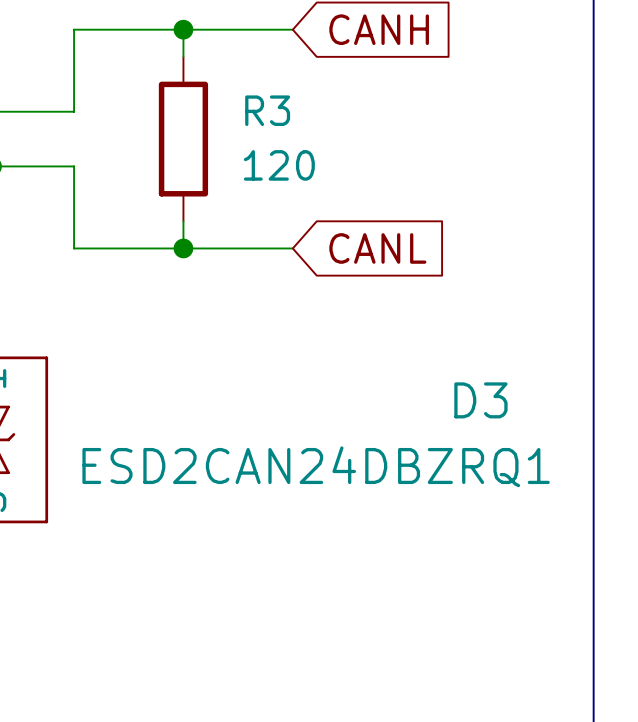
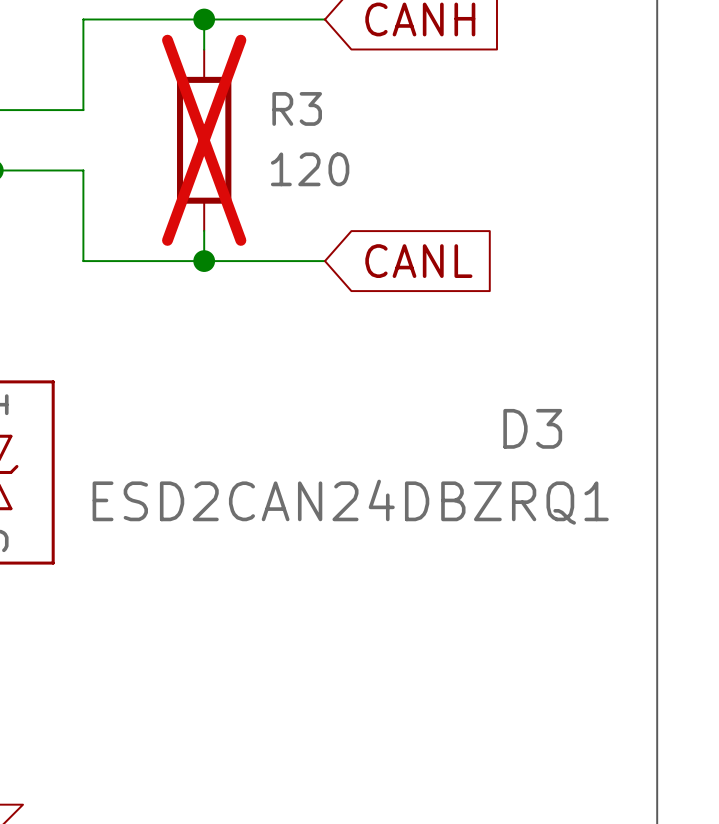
R3 do-not-place cross: none -> (204, 140)

